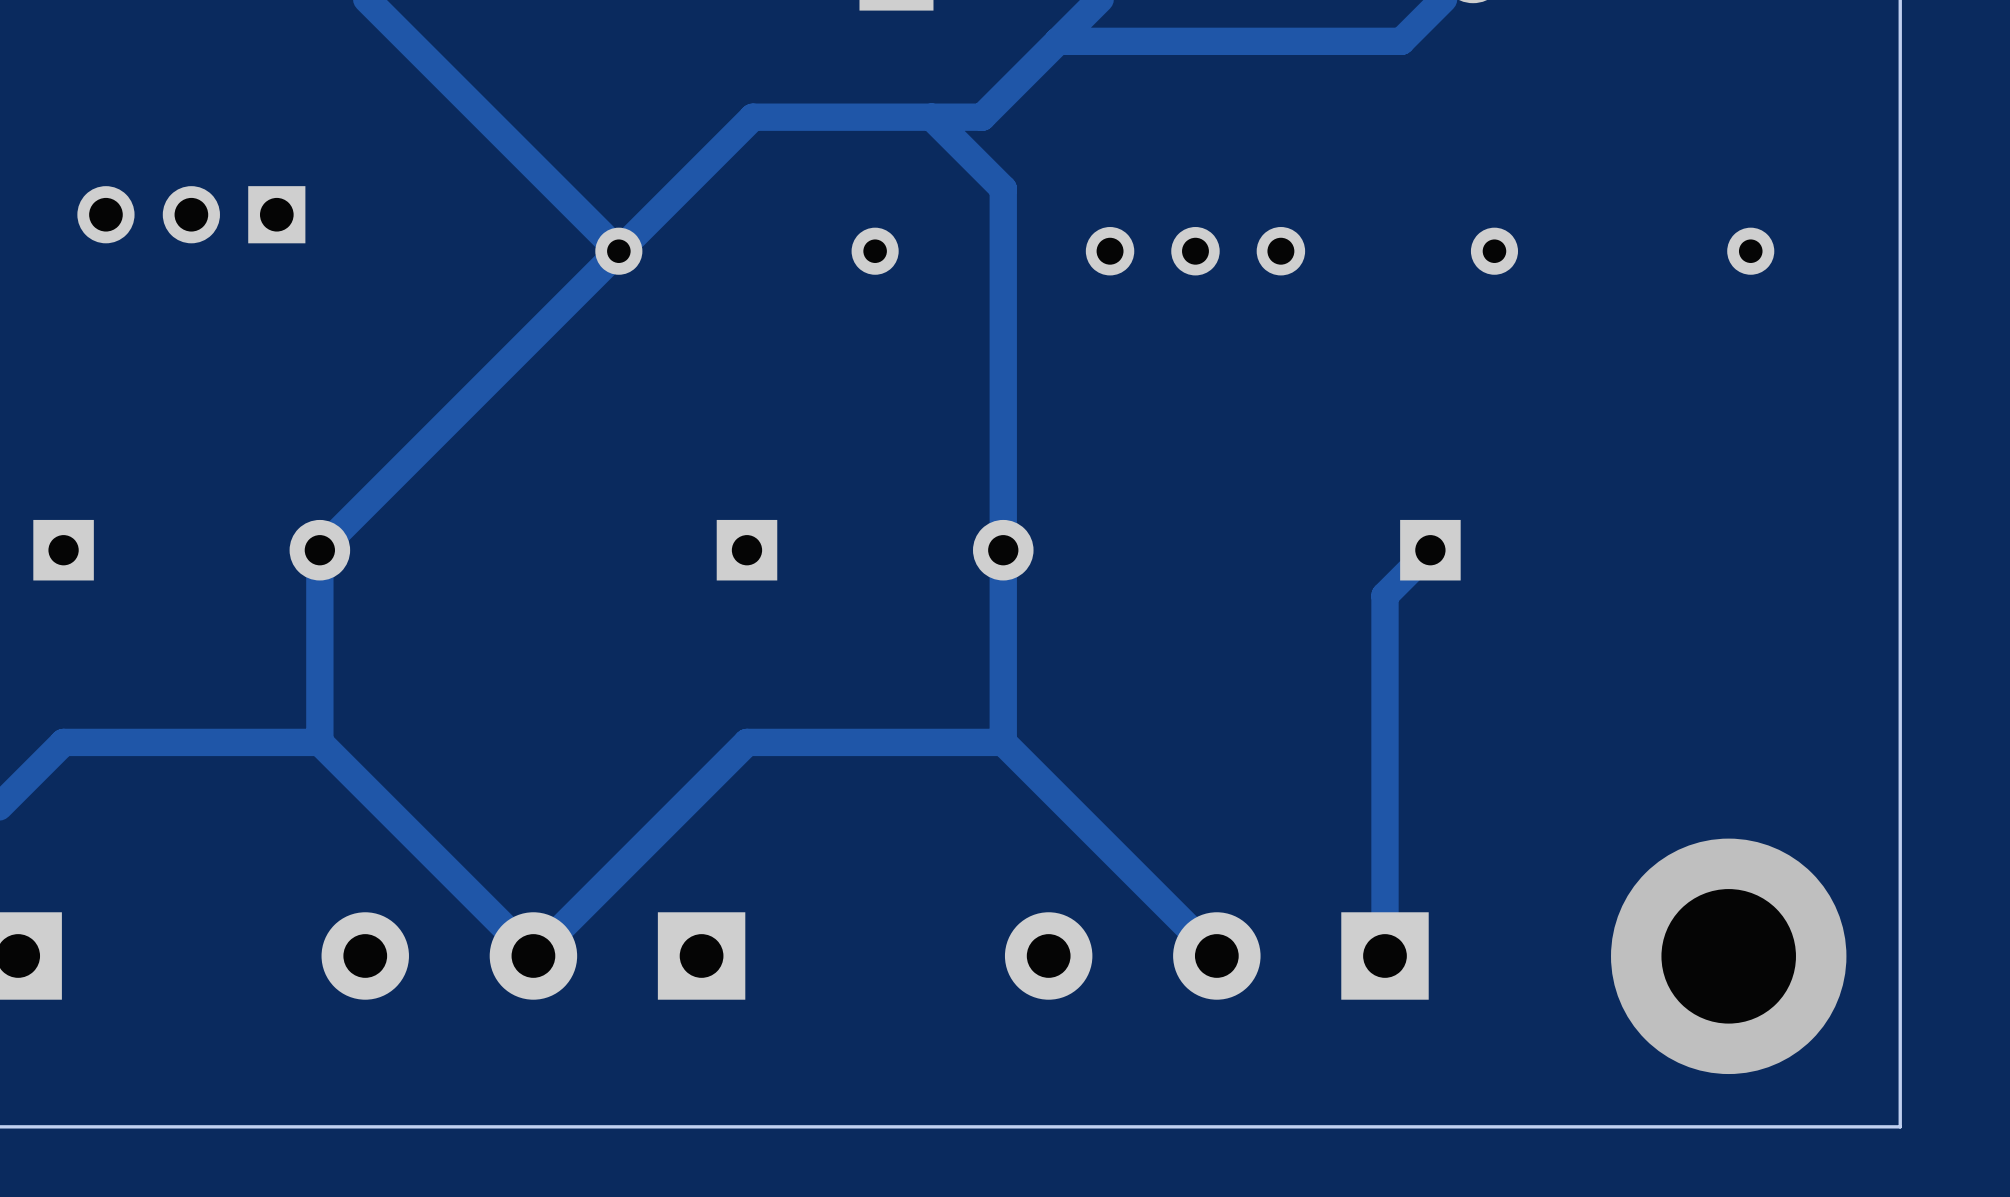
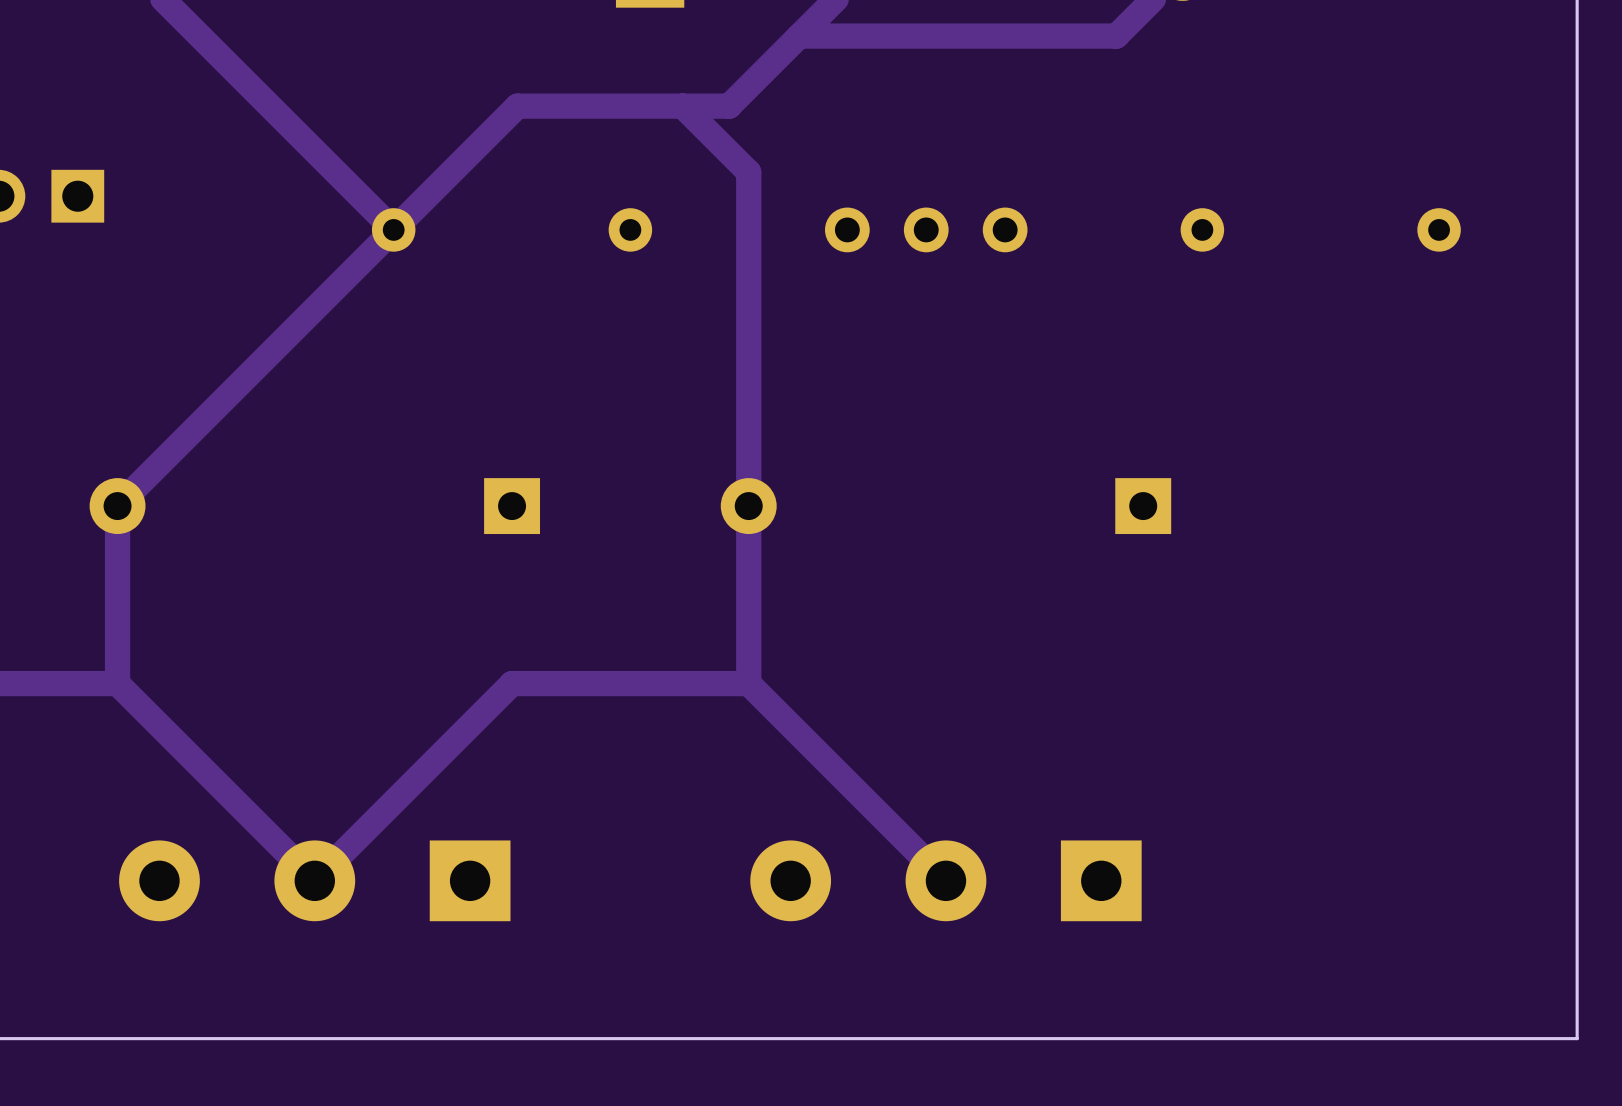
track: (1430, 550) (1384, 595) (1384, 955) -> none
via: (1728, 956) -> none

